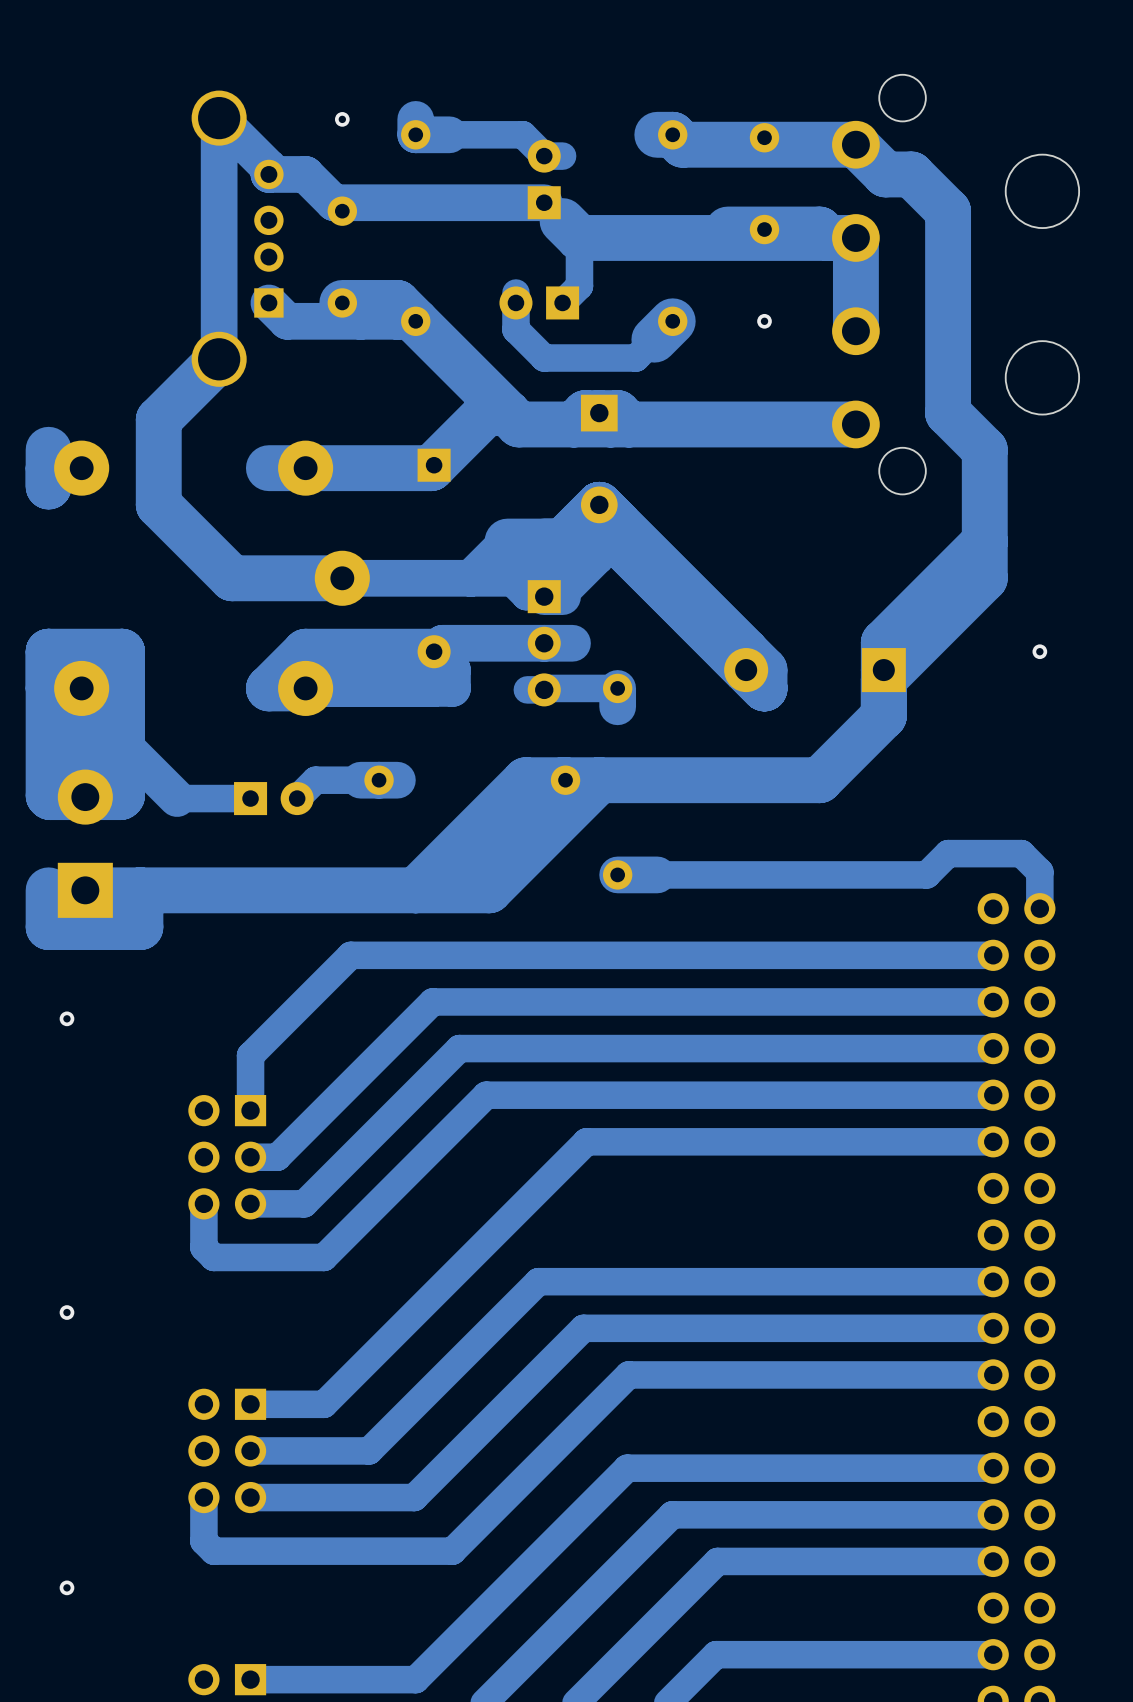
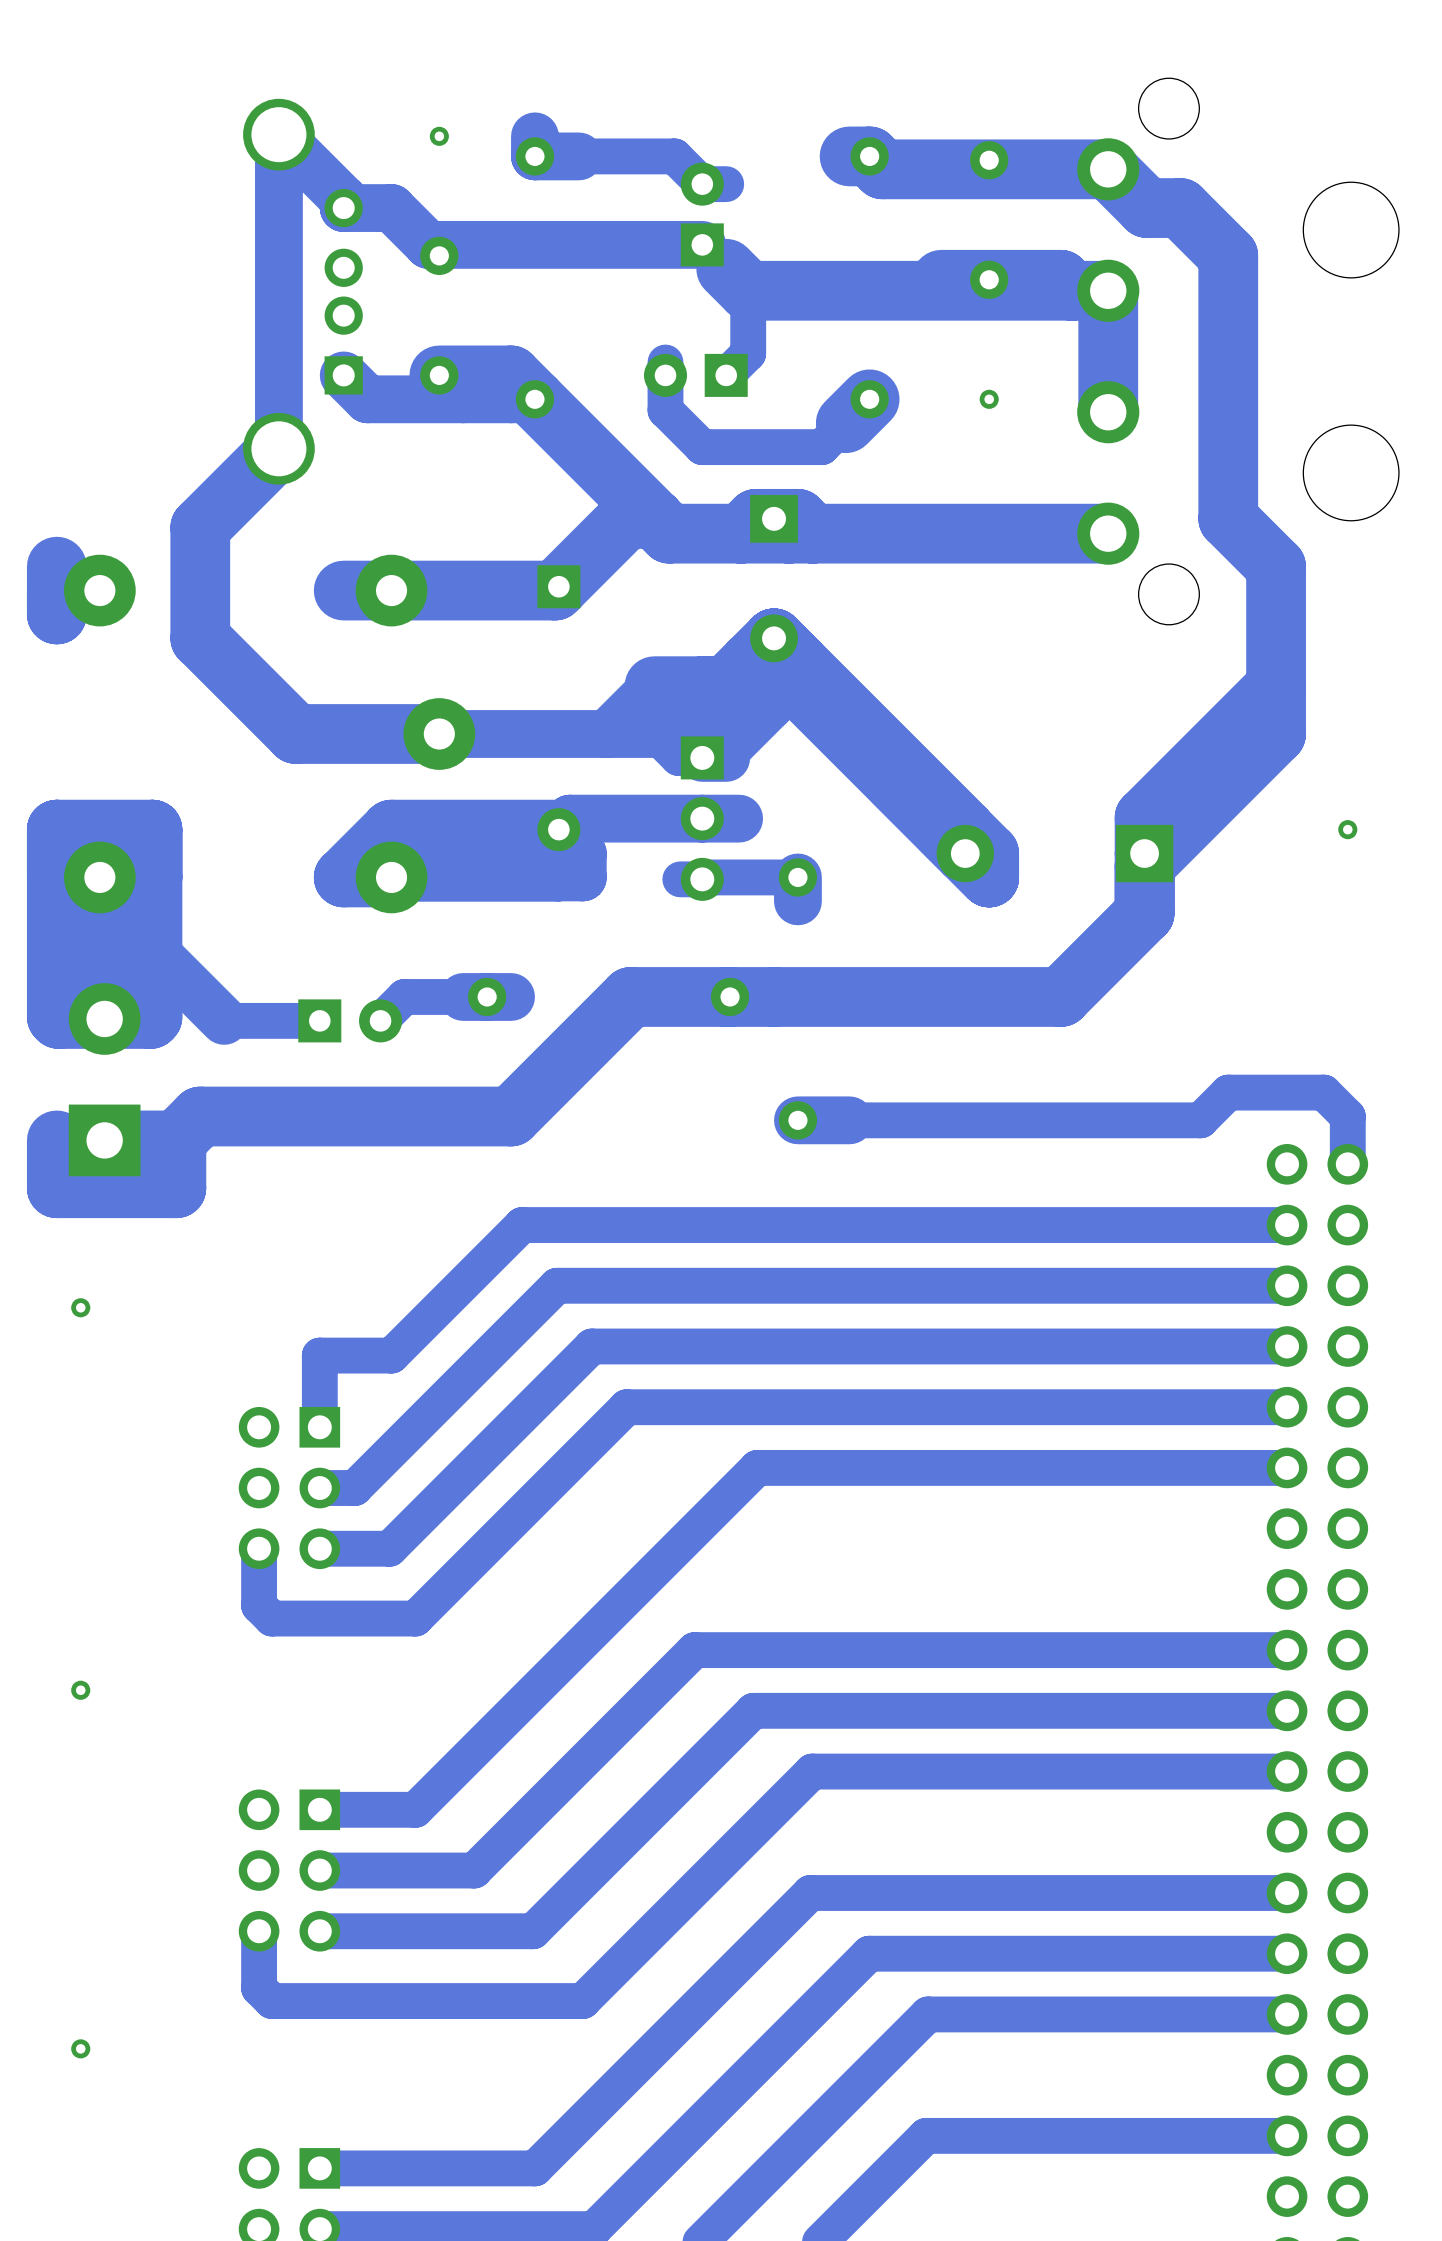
track: (562, 780) (452, 890) (415, 890) (525, 780) -> none
track: (599, 780) (489, 890) (140, 890) -> (678, 996) (630, 996) (511, 1116) (200, 1116) (176, 1140)
track: (405, 955) (350, 955) (250, 1055) -> (522, 1225) (391, 1355) (319, 1355)

